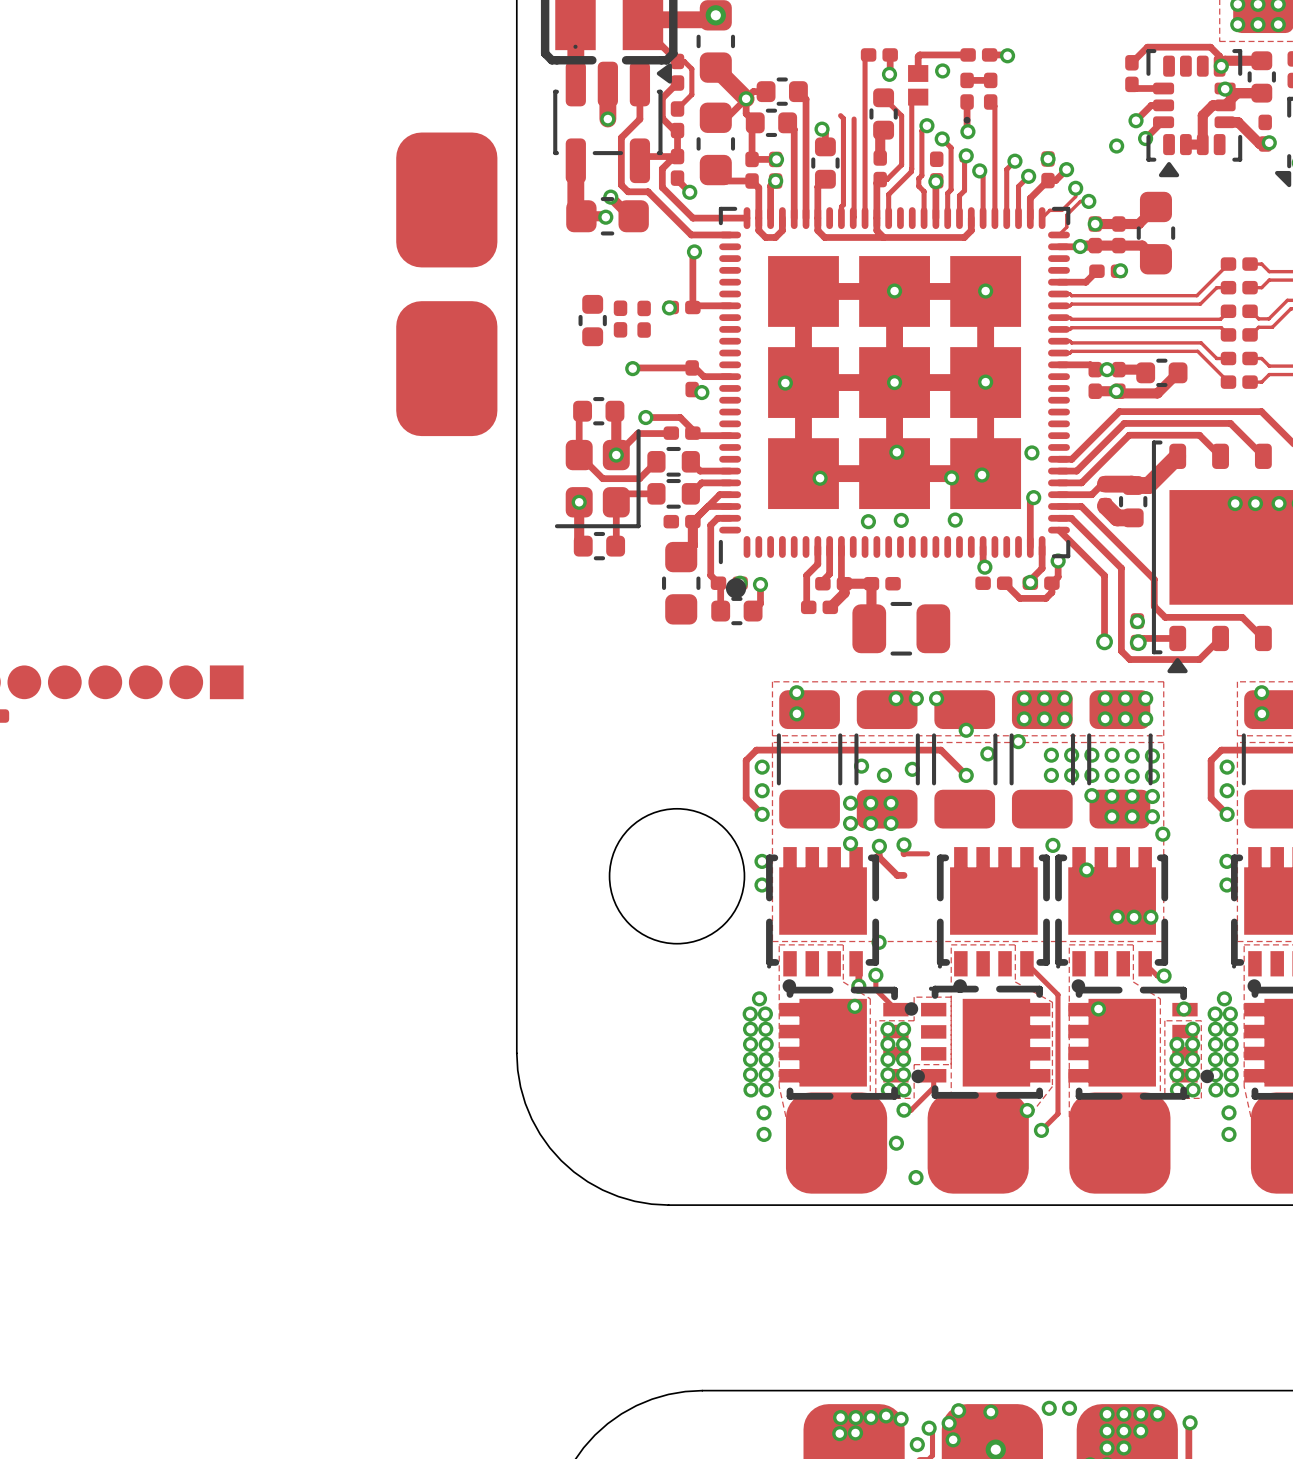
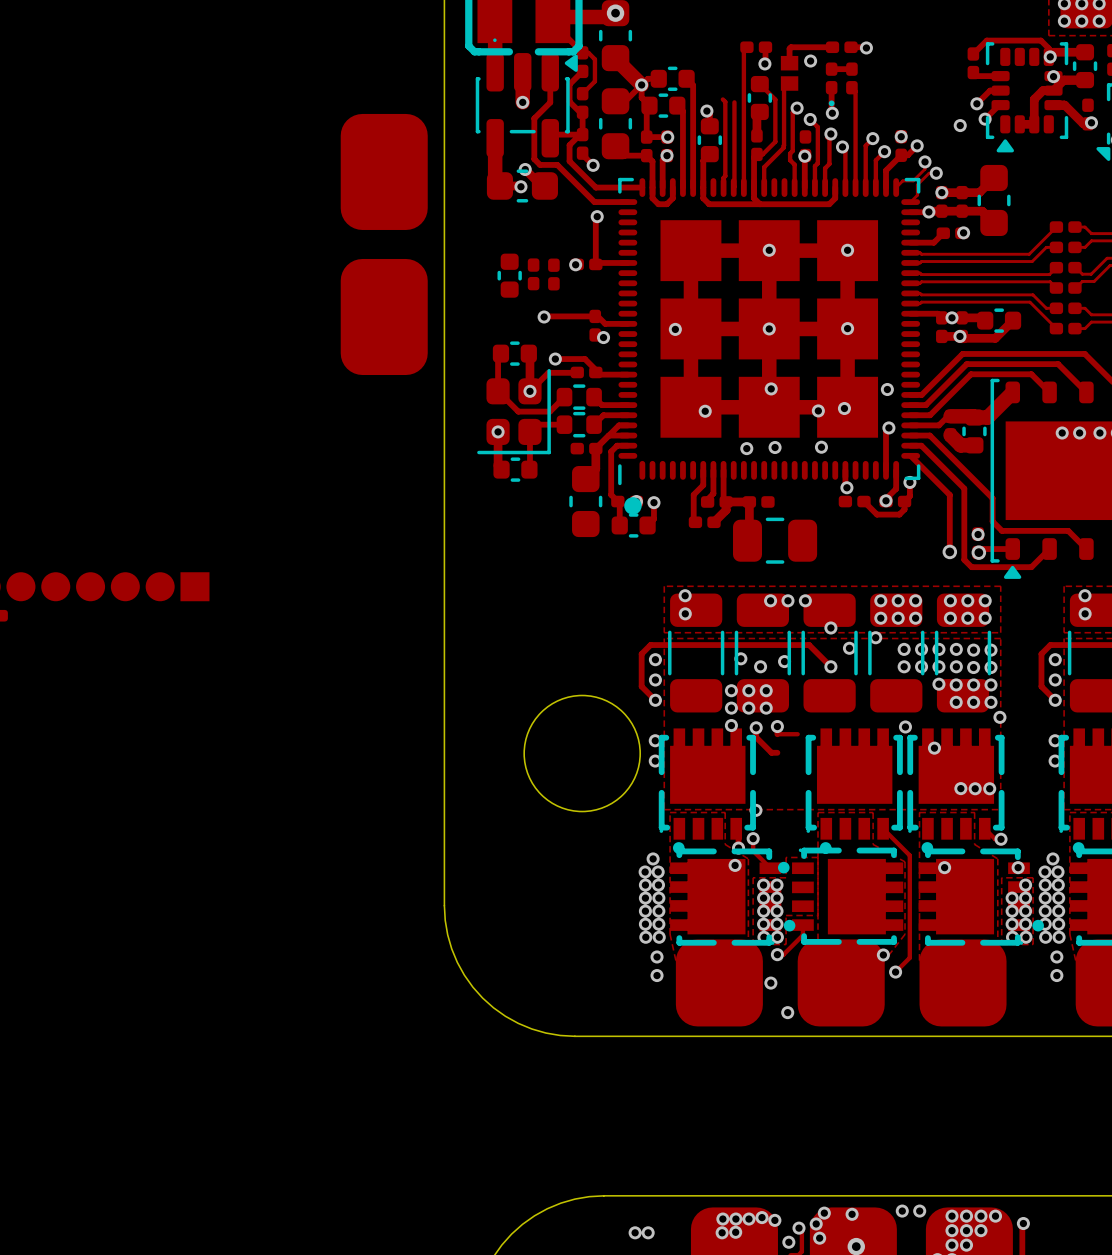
via: none -> (635, 1232)
via: none -> (648, 1232)

